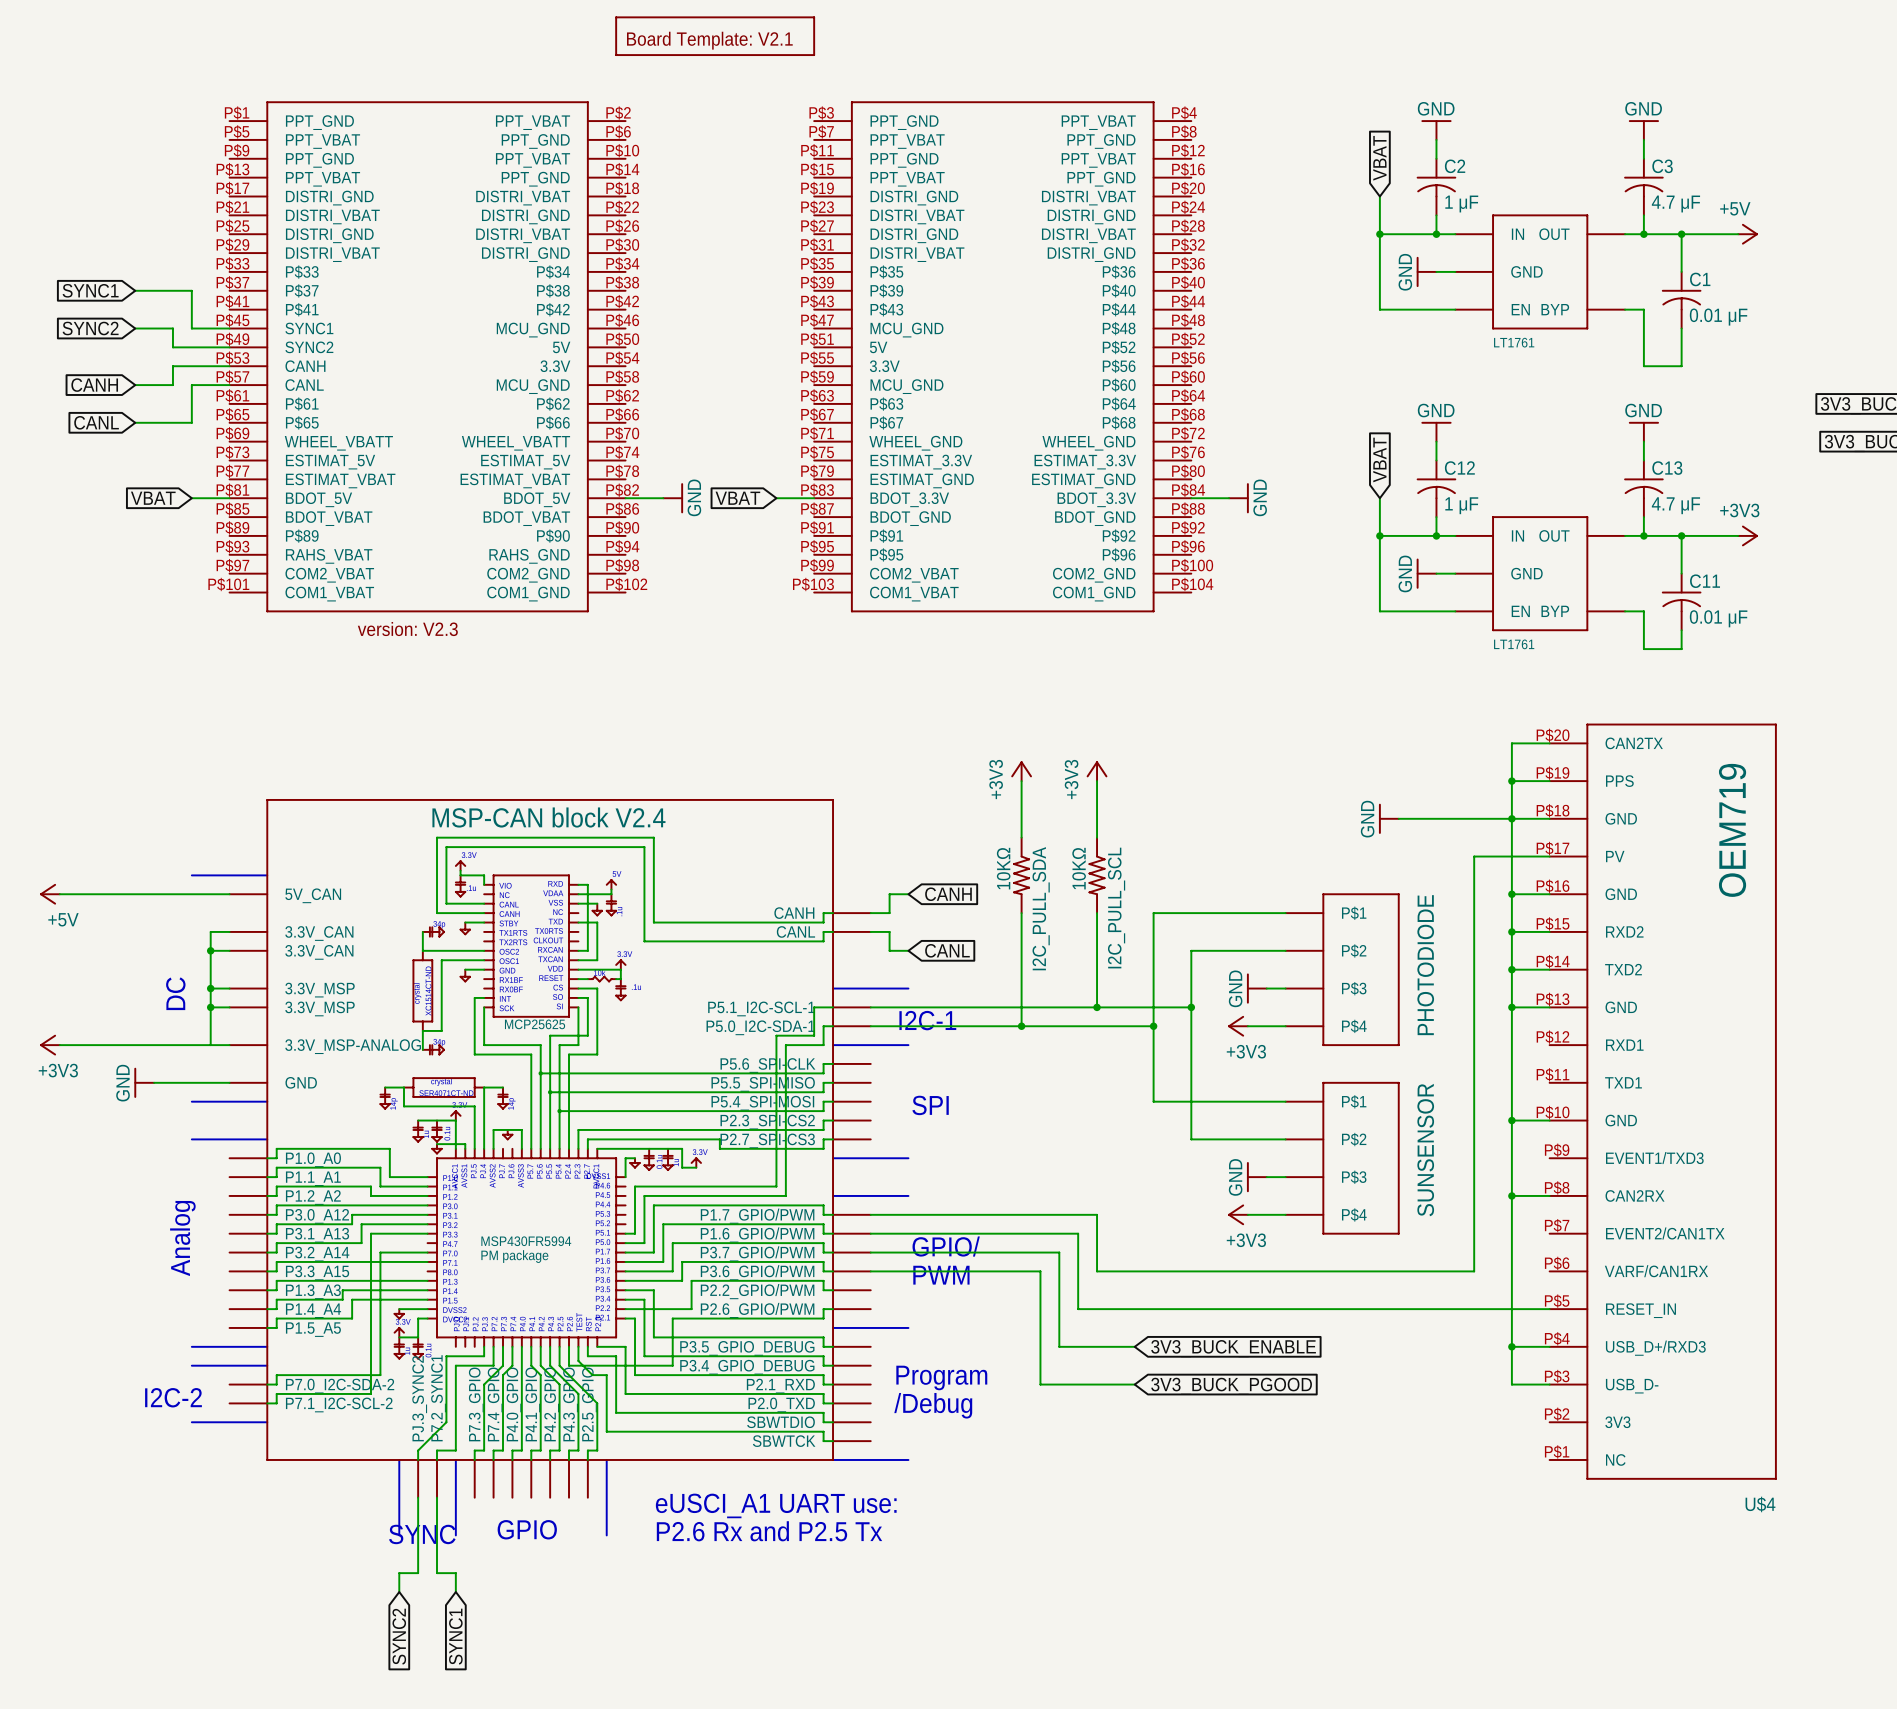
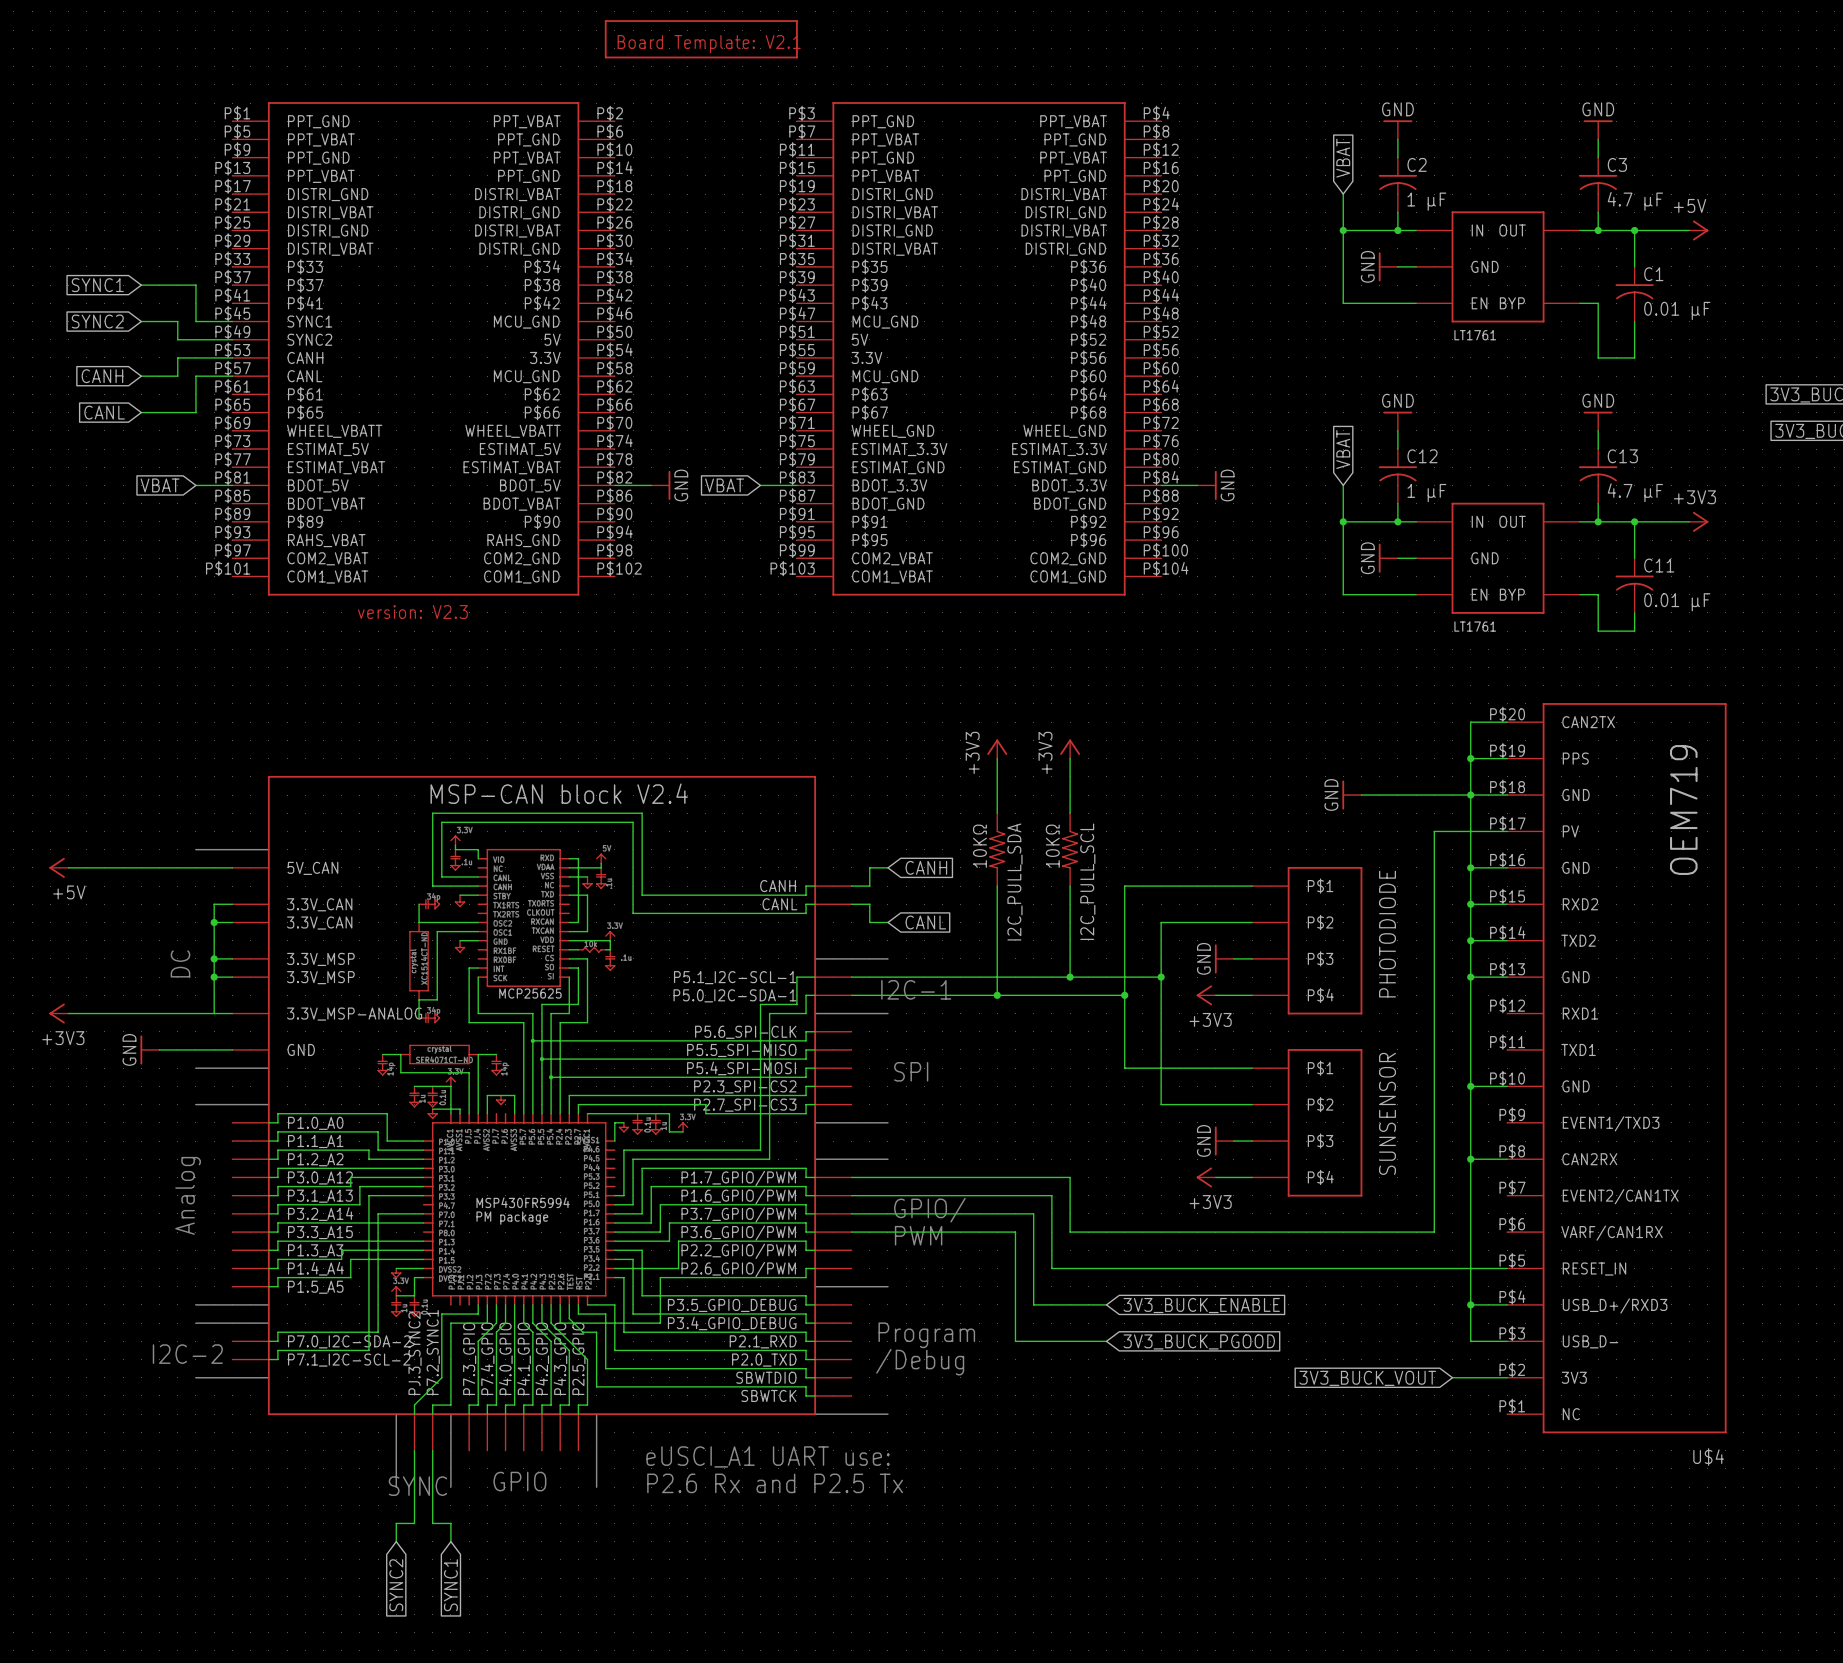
wire: none -> (1452, 1377) (1507, 1377)
global label: none -> 3V3_BUCK_VOUT (1367, 1378)

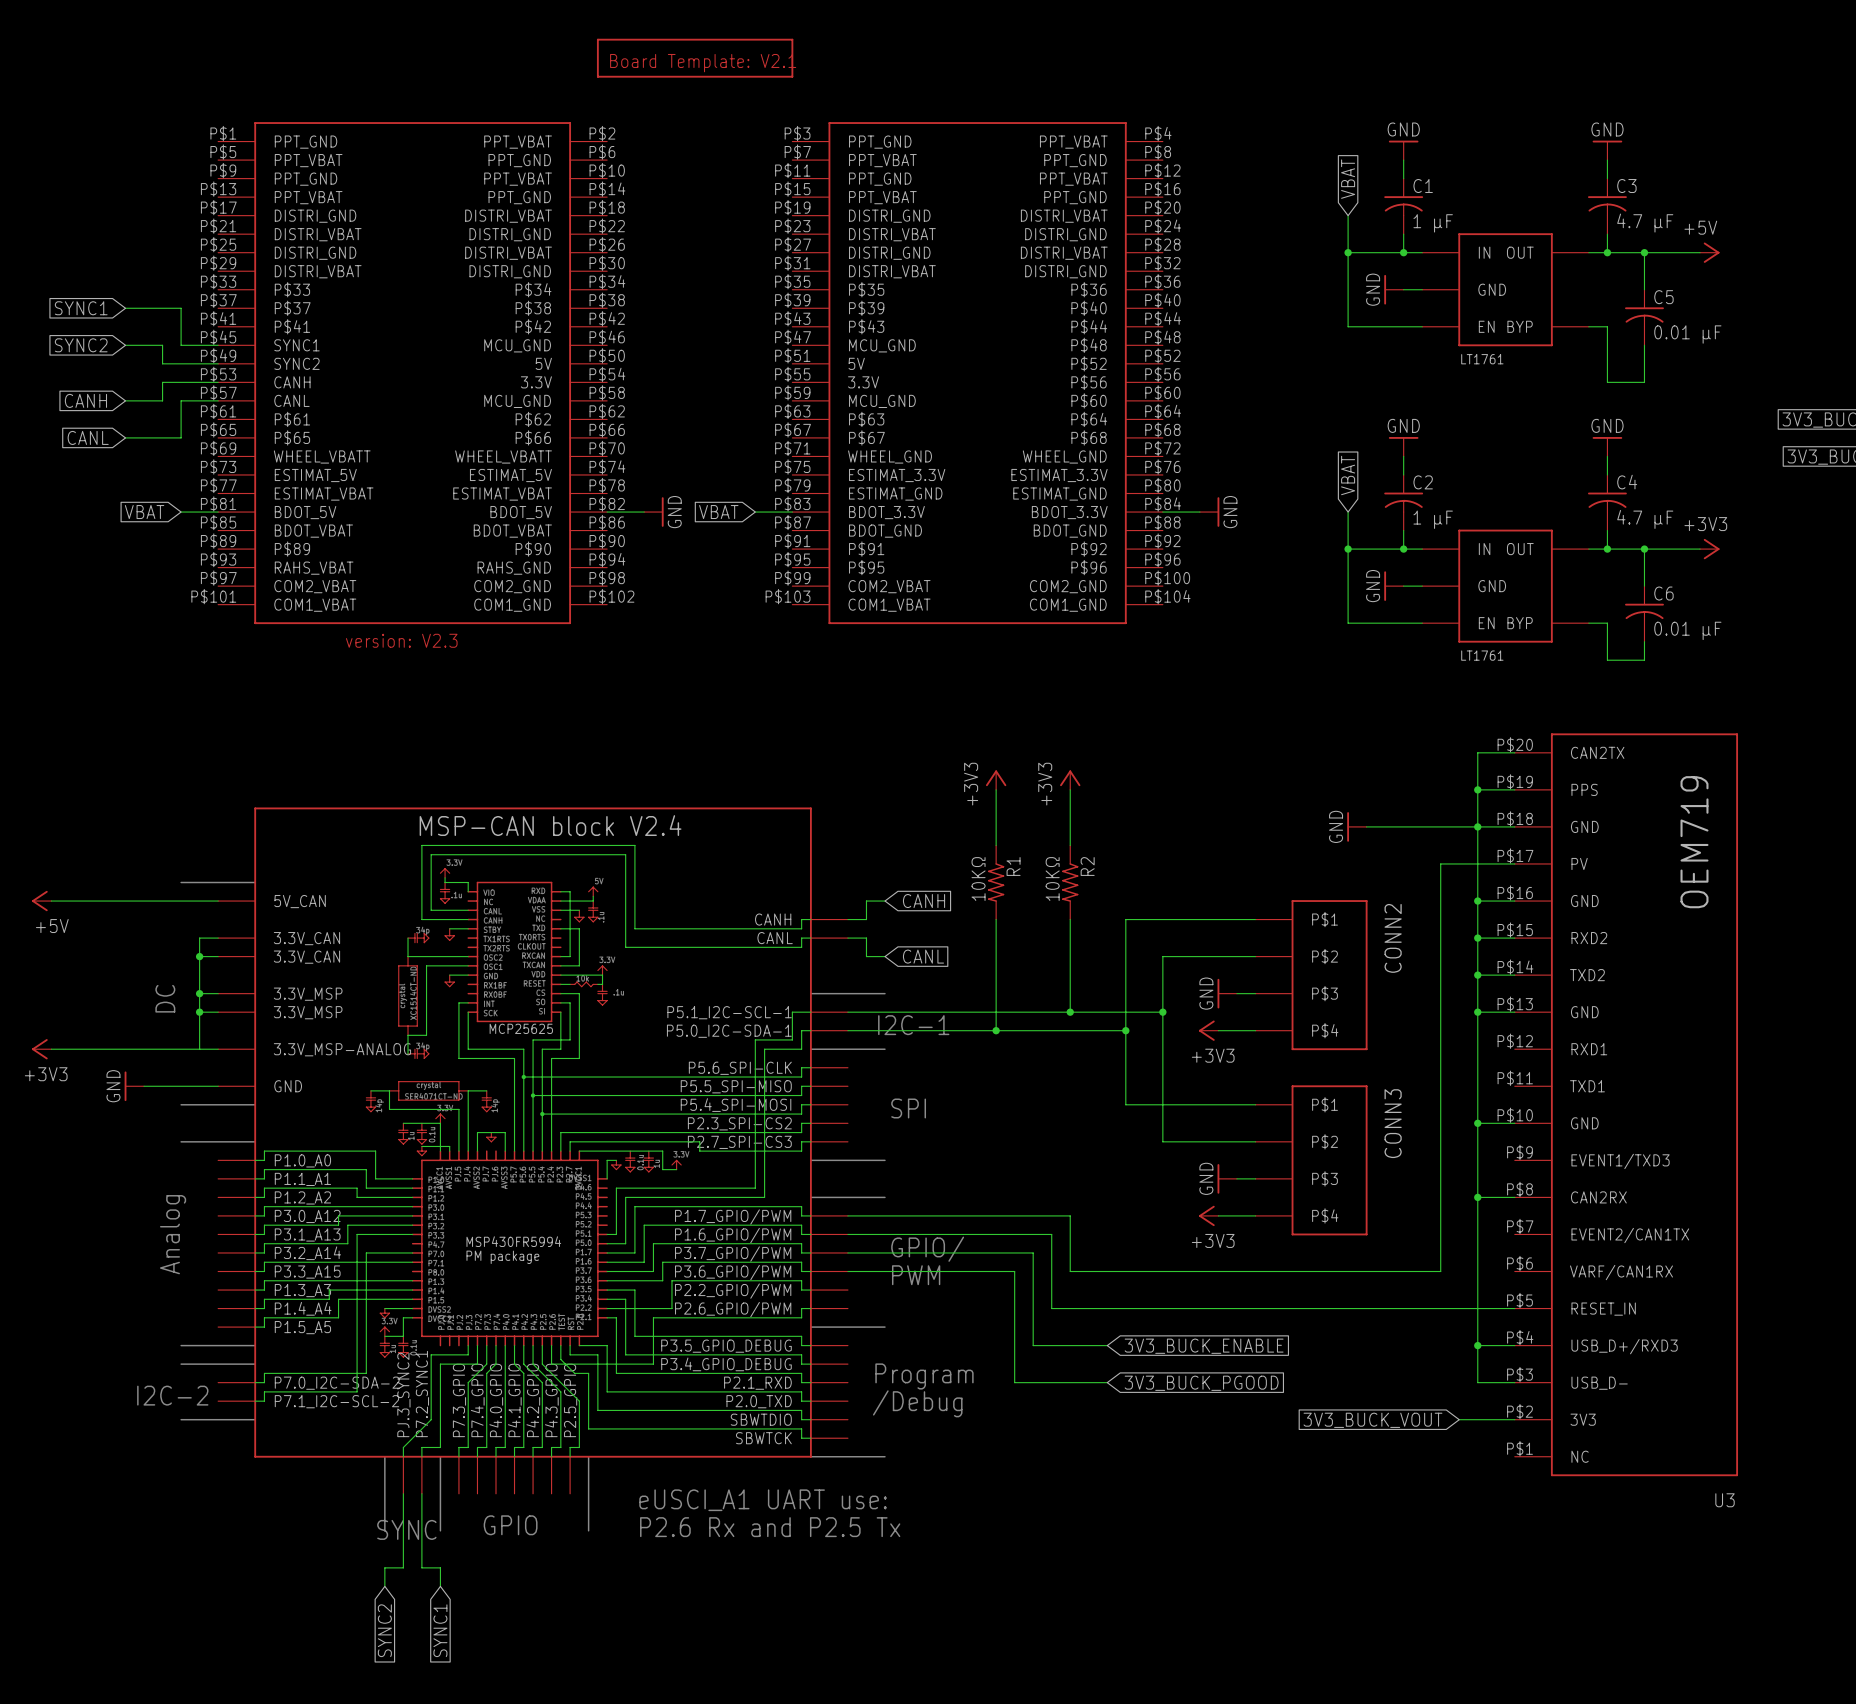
C2 name: C2 (1417, 164) -> C1 (1423, 186)
C1 name: C1 (1653, 274) -> C5 (1663, 297)
C12 name: C12 (1422, 456) -> C2 (1423, 482)
C13 name: C13 (1622, 456) -> C4 (1627, 482)
C11 name: C11 (1659, 565) -> C6 (1663, 593)
I2C_PULL_SCL name: I2C_PULL_SCL (1087, 881) -> R2 (1087, 866)
I2C_PULL_SDA name: I2C_PULL_SDA (1014, 882) -> R1 (1013, 866)
PHOTODIODE name: PHOTODIODE (1387, 934) -> CONN2 (1393, 938)
SUNSENSOR name: SUNSENSOR (1387, 1113) -> CONN3 (1393, 1123)
U$4 name: U$4 (1708, 1456) -> U3 (1725, 1500)

